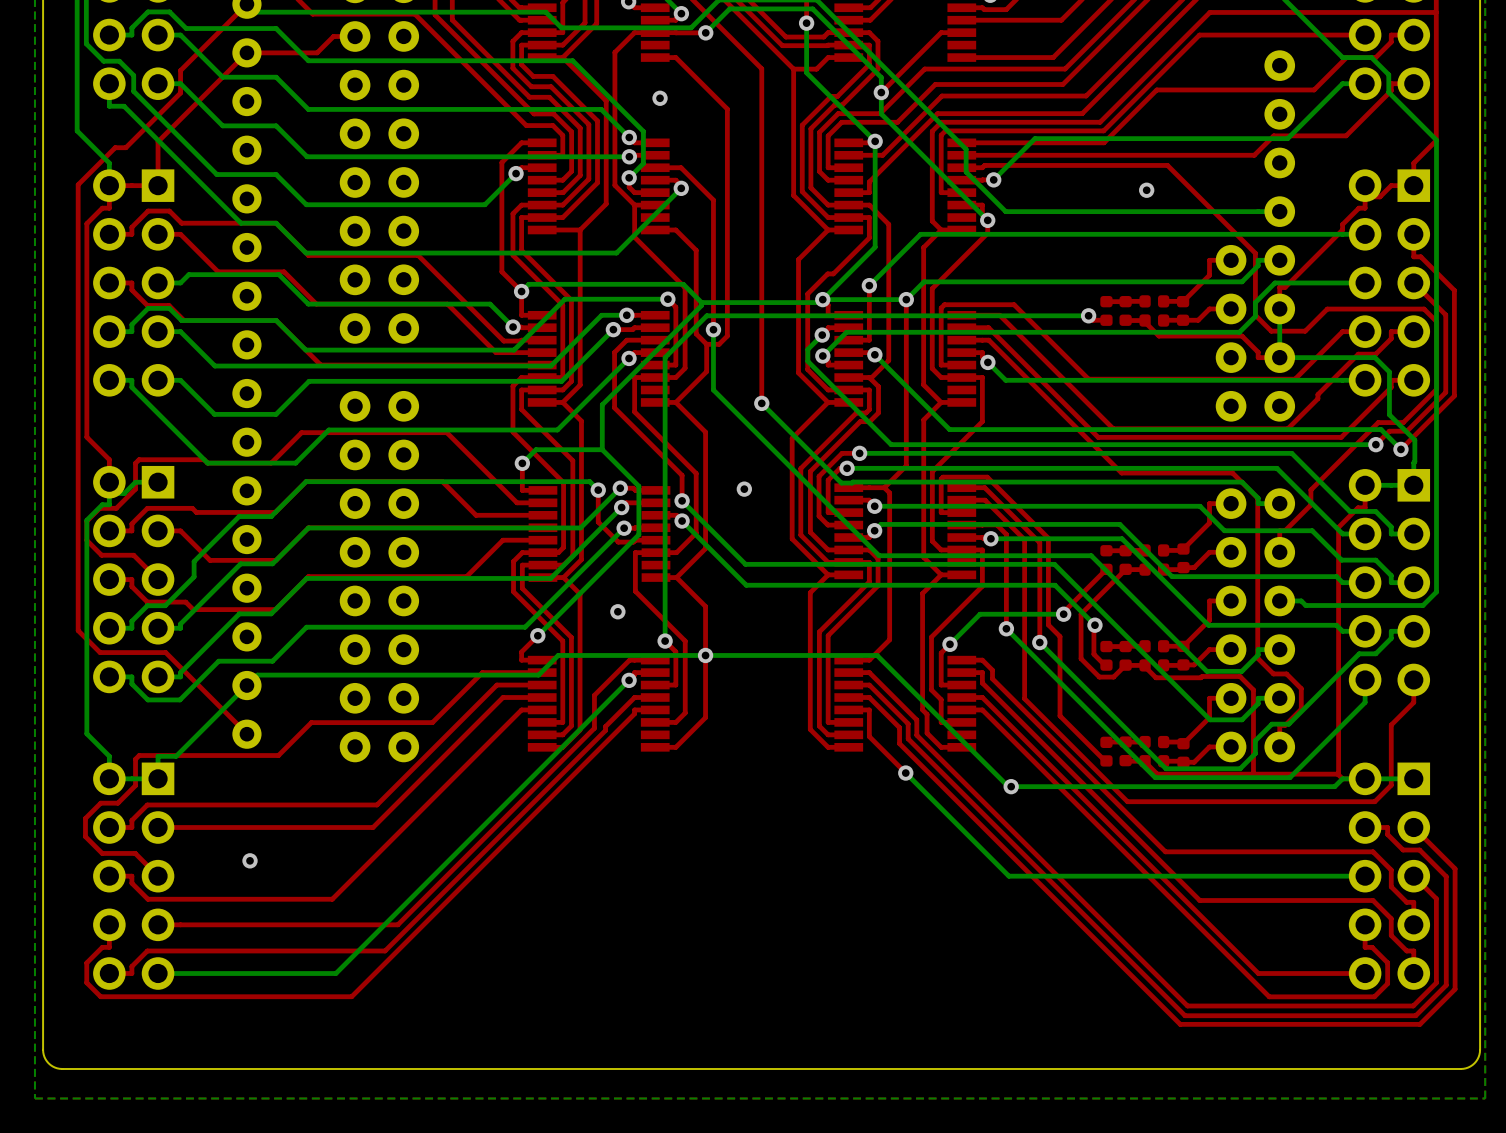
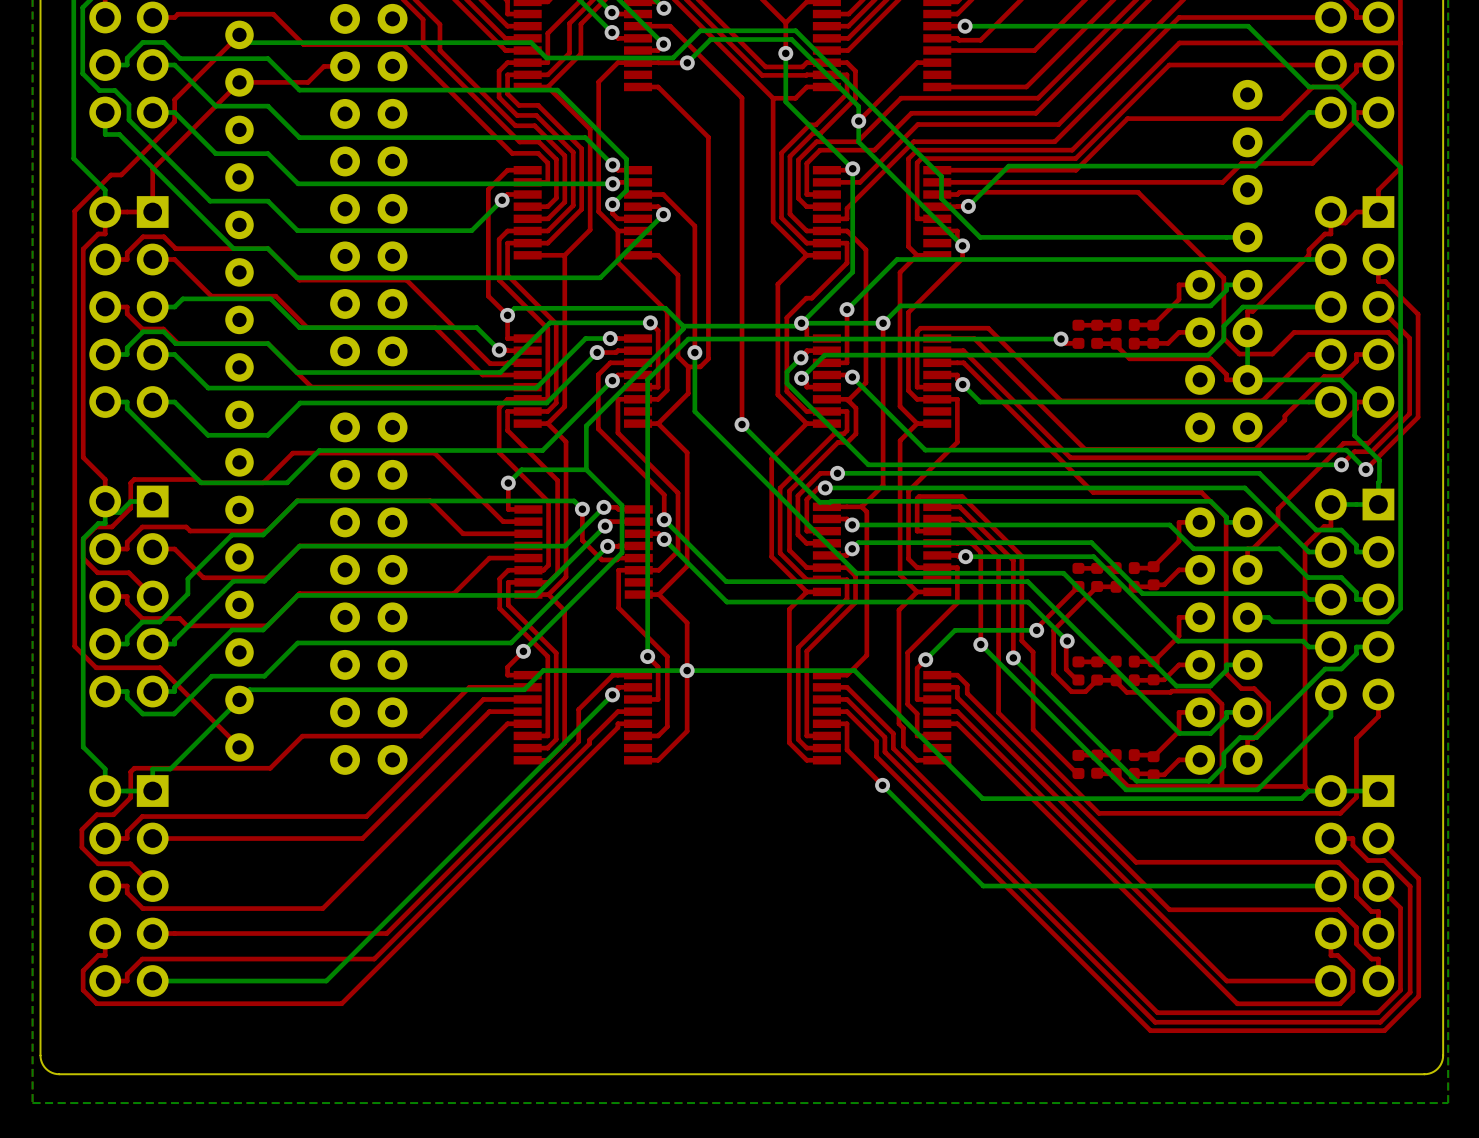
via: (660, 98) -> none
via: (1146, 190) -> none
via: (744, 489) -> none
via: (617, 611) -> none
via: (1011, 786) -> none
via: (250, 860) -> none

